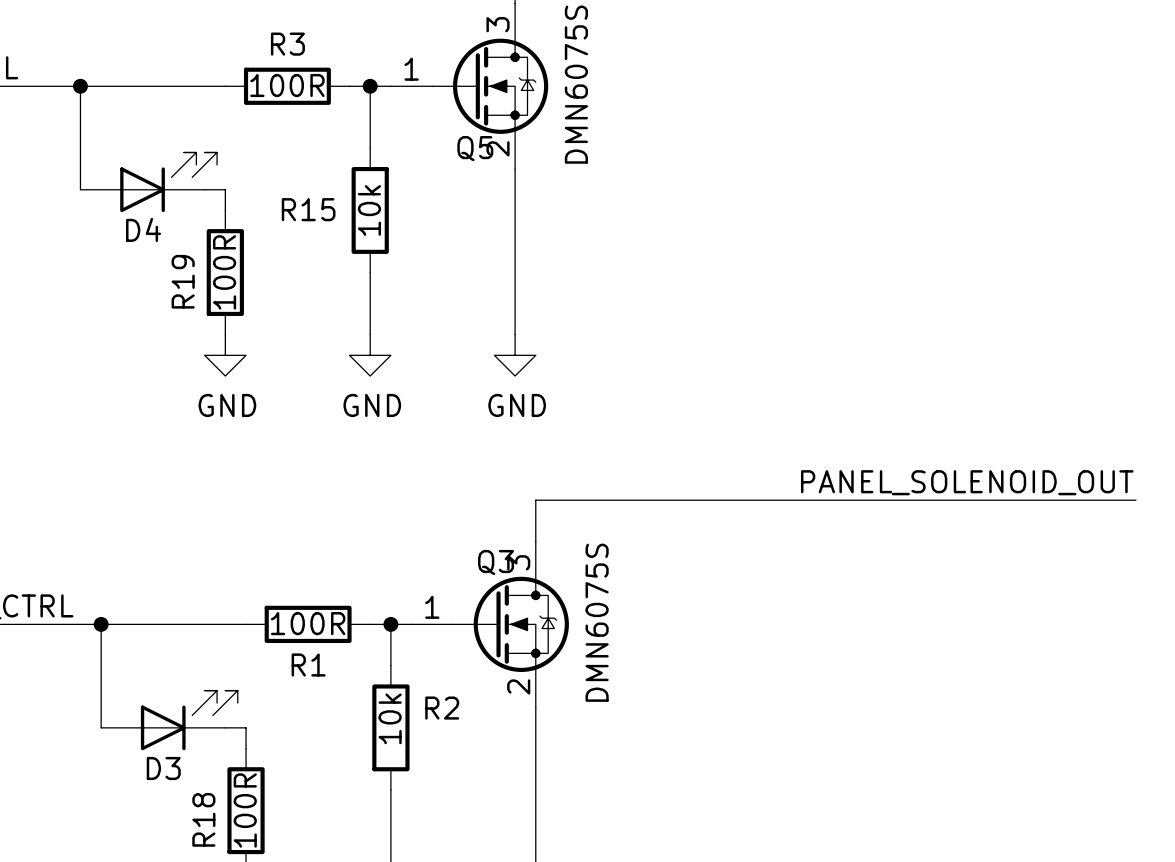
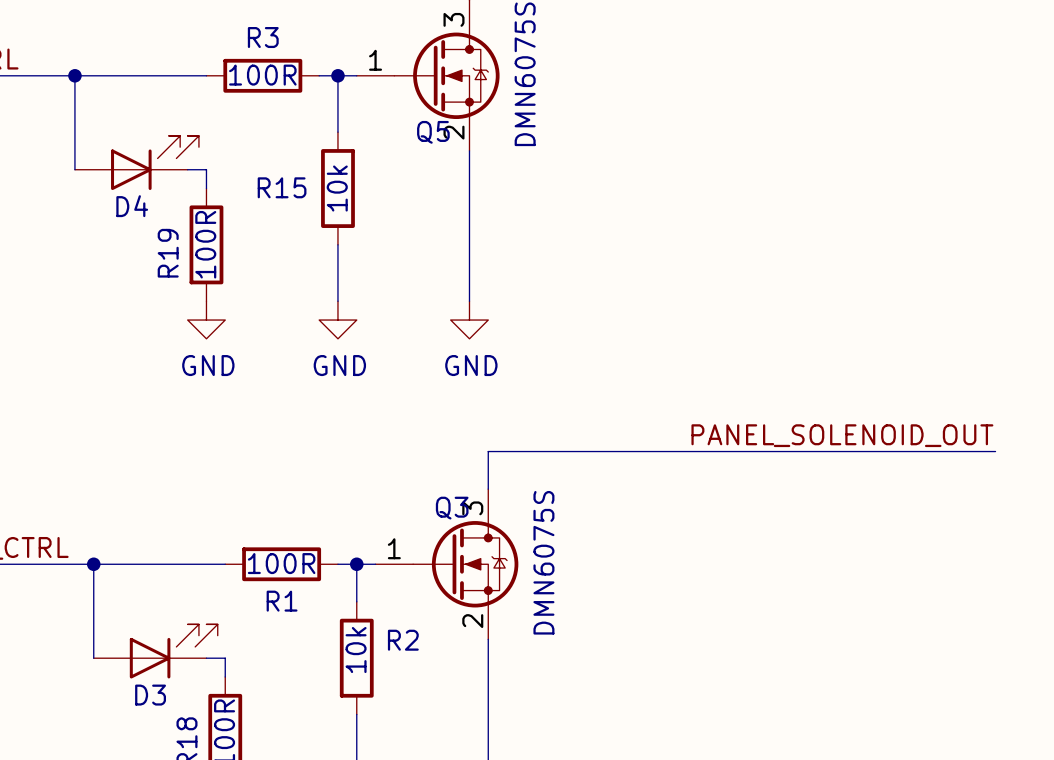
label position: PANEL_SOLENOID_OUT (967, 482) -> PANEL_SOLENOID_OUT (842, 435)
wire: (1094, 500) (1135, 500) -> none

